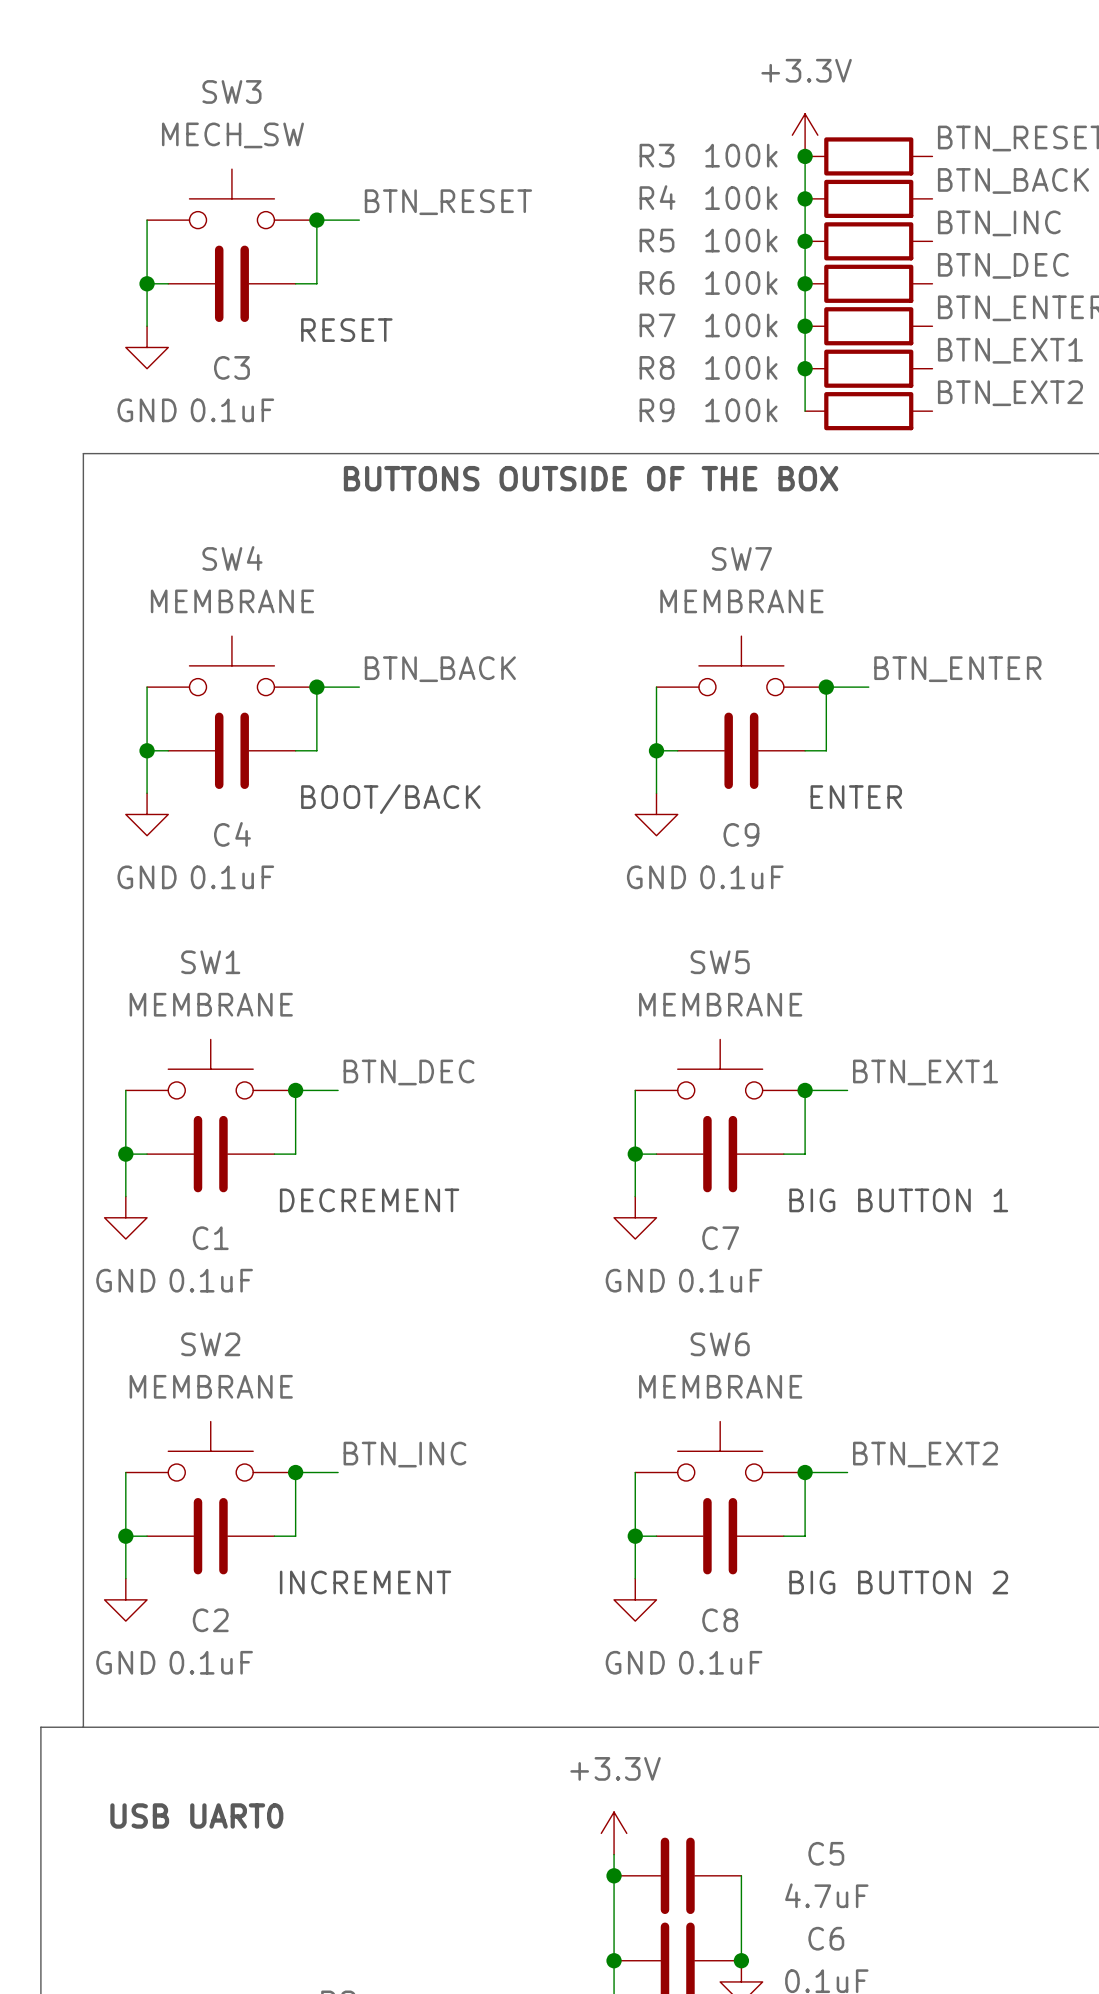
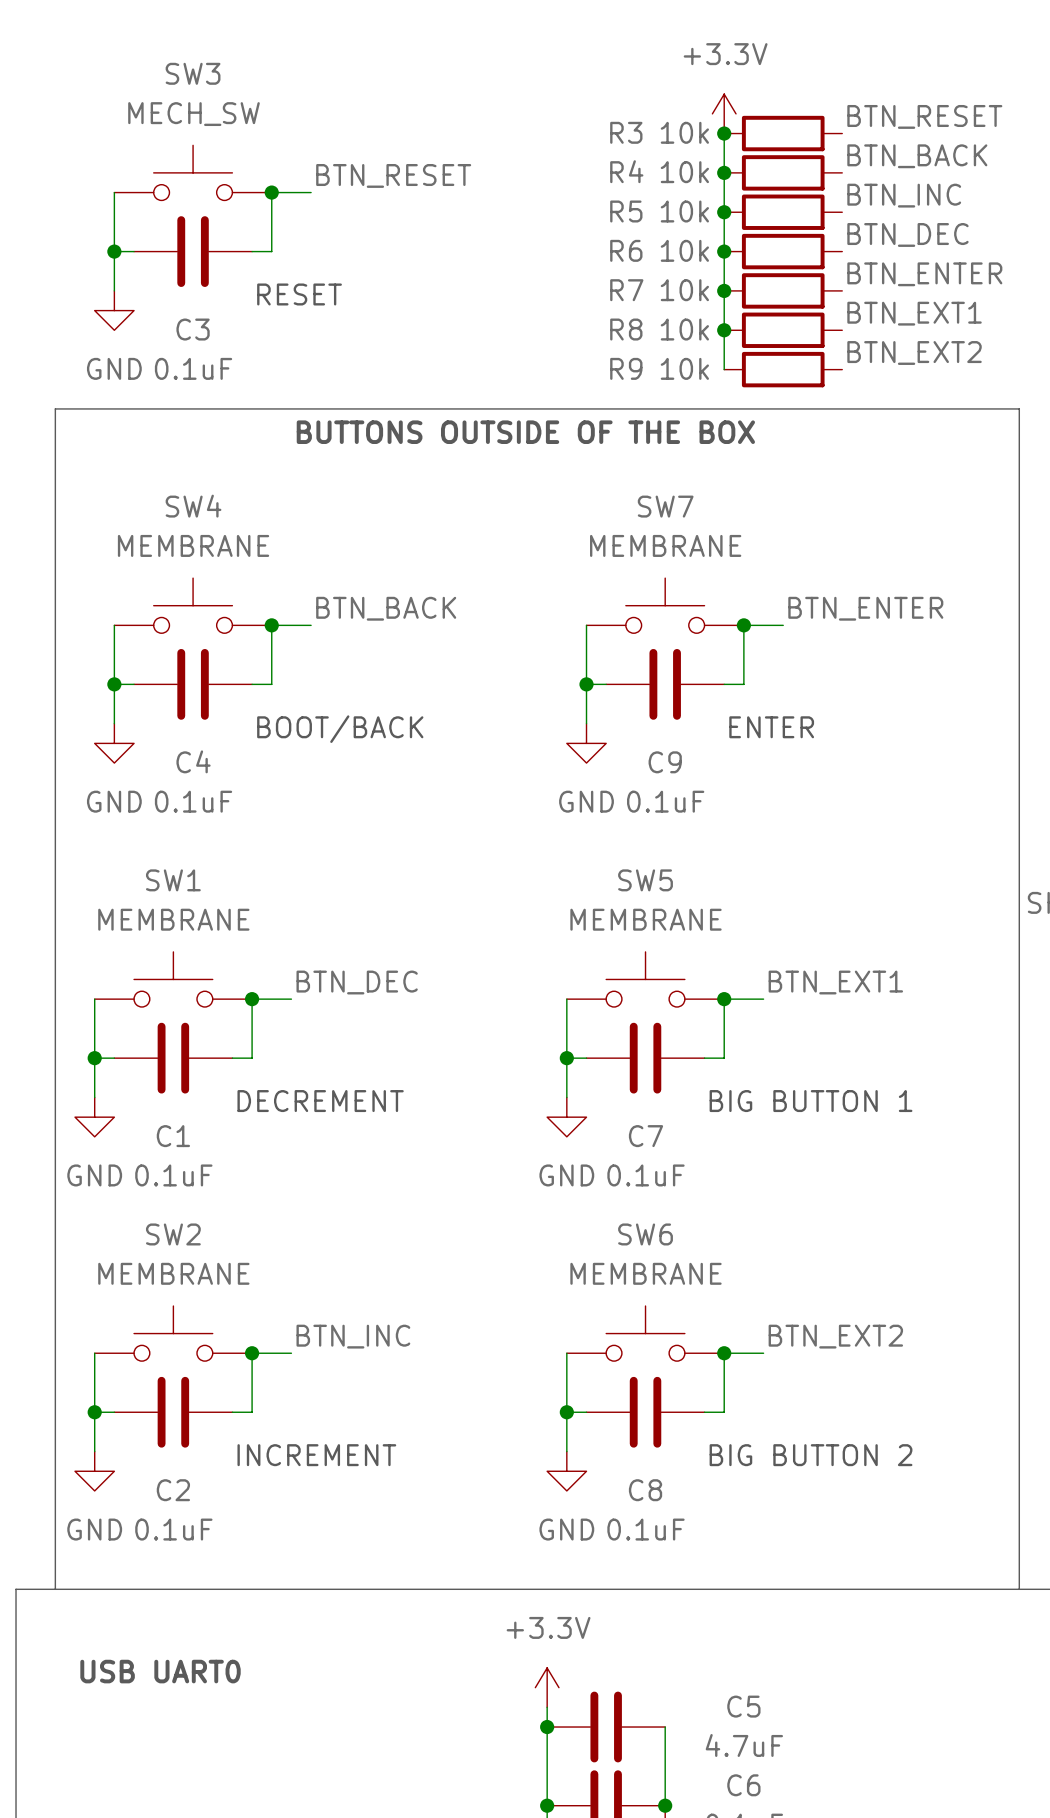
R3 name position: R3 (657, 155) -> R3 (626, 132)
R3 value: 100k (741, 155) -> 10k (684, 132)
R4 name position: R4 (657, 197) -> R4 (626, 171)
R4 value: 100k (741, 198) -> 10k (684, 172)
R5 name position: R5 (657, 240) -> R5 (626, 211)
R5 value: 100k (741, 240) -> 10k (684, 211)
R6 name position: R6 (657, 283) -> R6 (626, 250)
R6 value: 100k (741, 283) -> 10k (684, 250)
R7 name position: R7 (657, 325) -> R7 (626, 290)
R7 value: 100k (741, 325) -> 10k (684, 290)
R8 name position: R8 (657, 367) -> R8 (626, 329)
R8 value: 100k (741, 367) -> 10k (684, 329)
R9 name position: R9 (657, 410) -> R9 (626, 368)
R9 value: 100k (741, 410) -> 10k (684, 368)

